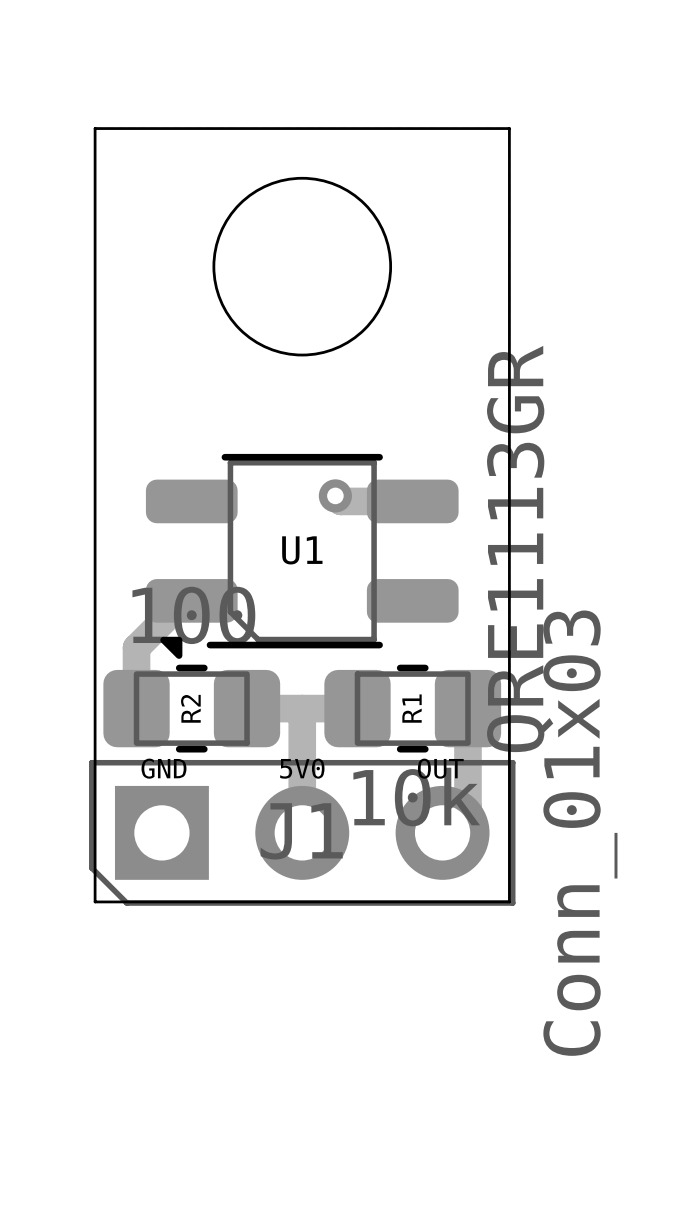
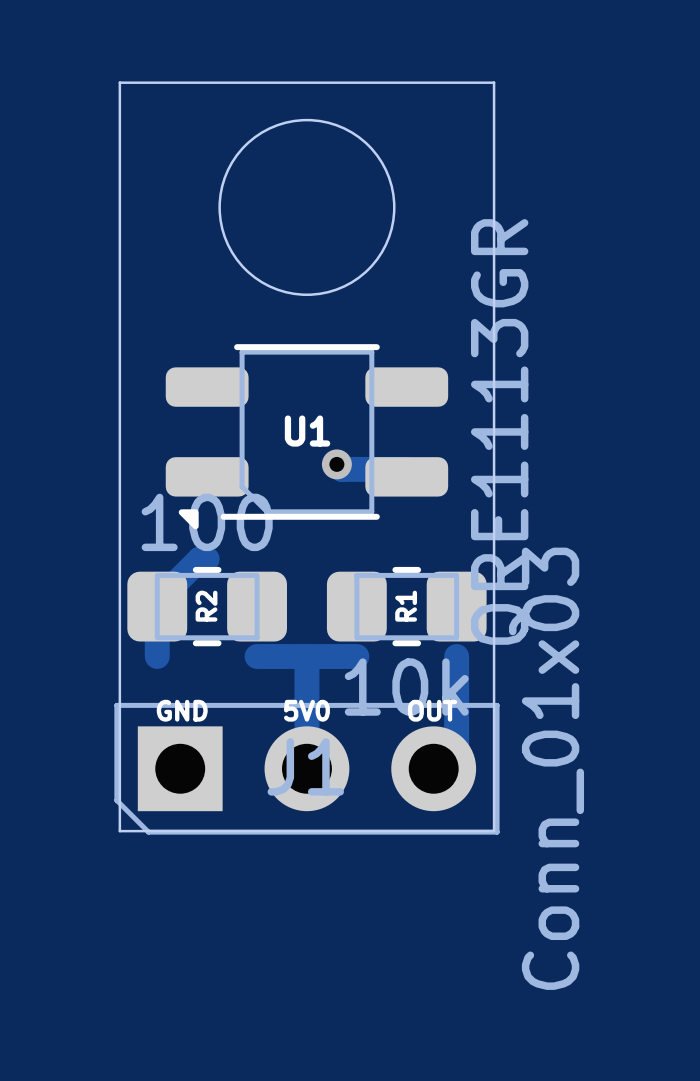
board edge: (95, 128) (509, 128) -> (119, 132) (119, 82) (494, 82) (494, 132)
round board edge position: (302, 266) -> (306, 207)
U1 position: (302, 556) -> (306, 436)
R2 position: (191, 708) -> (207, 606)
R1 position: (412, 708) -> (406, 606)

